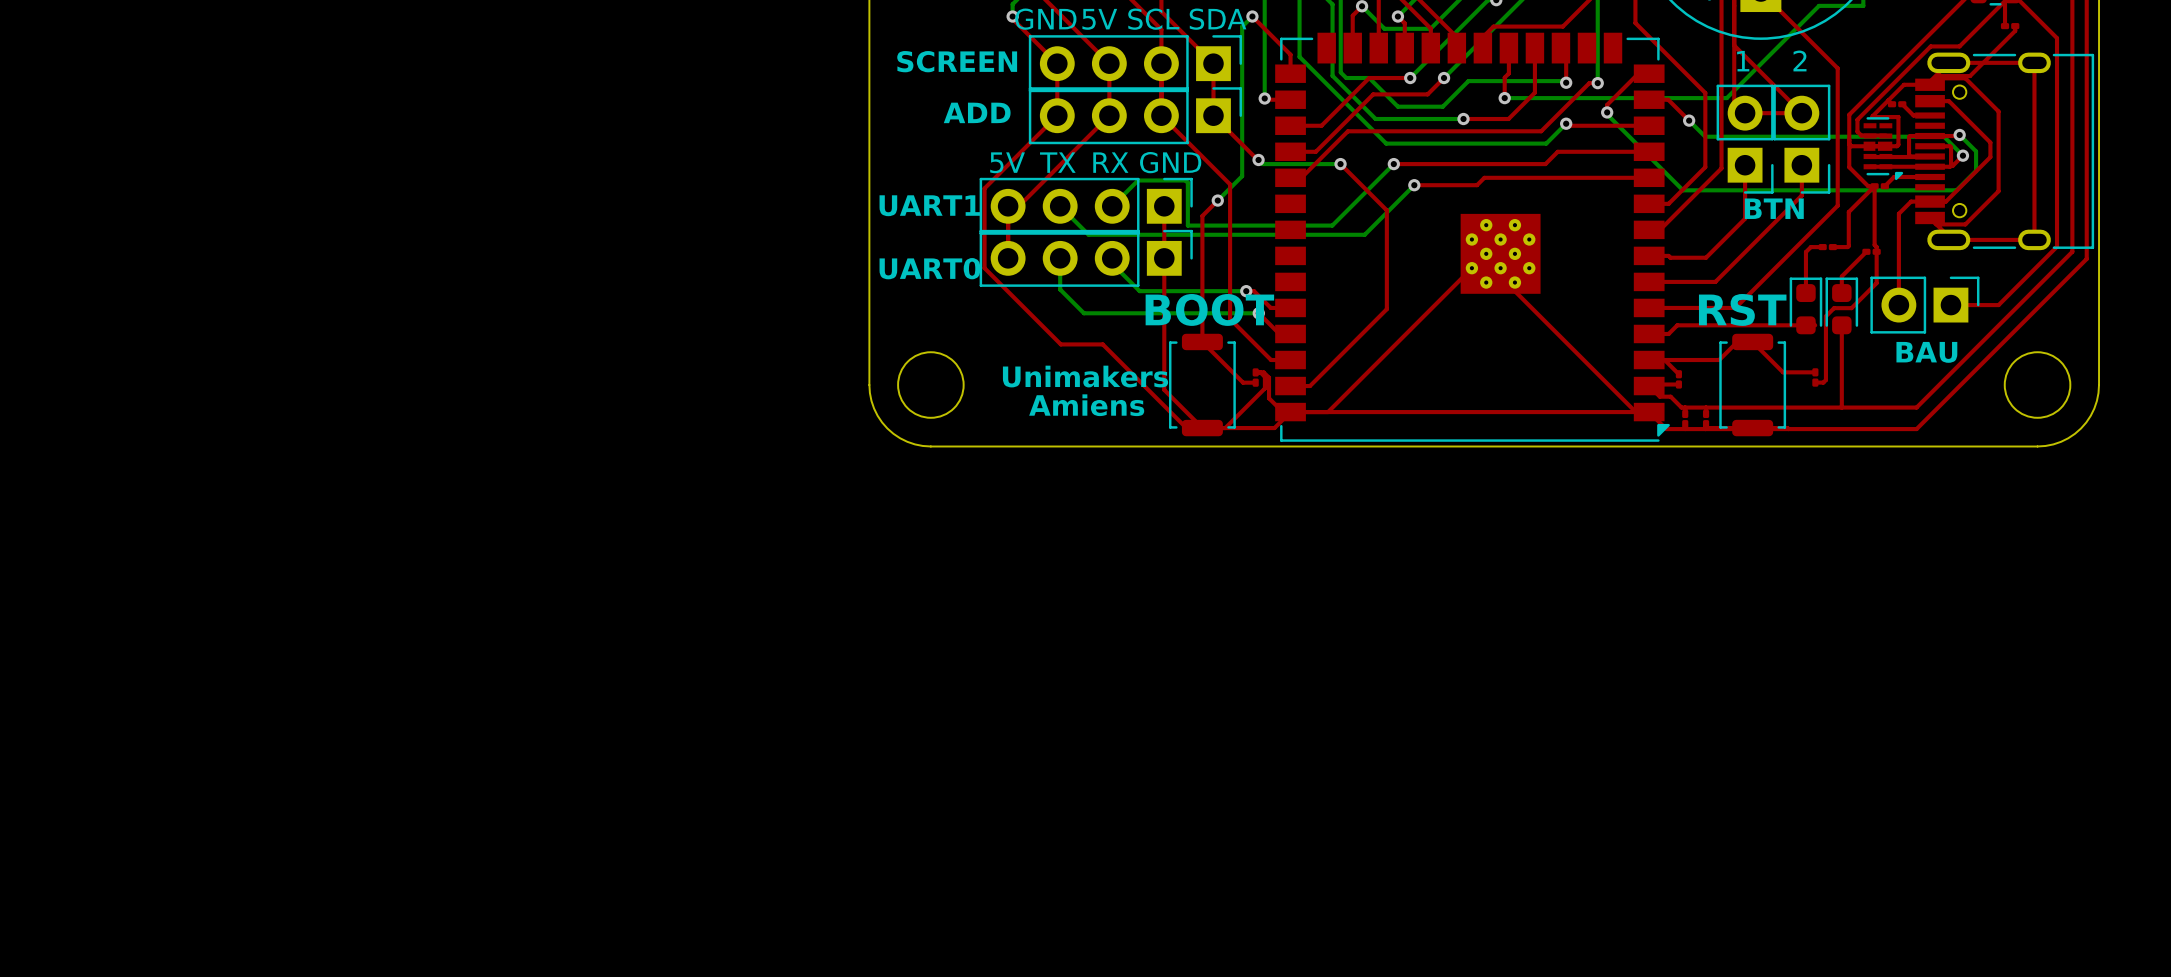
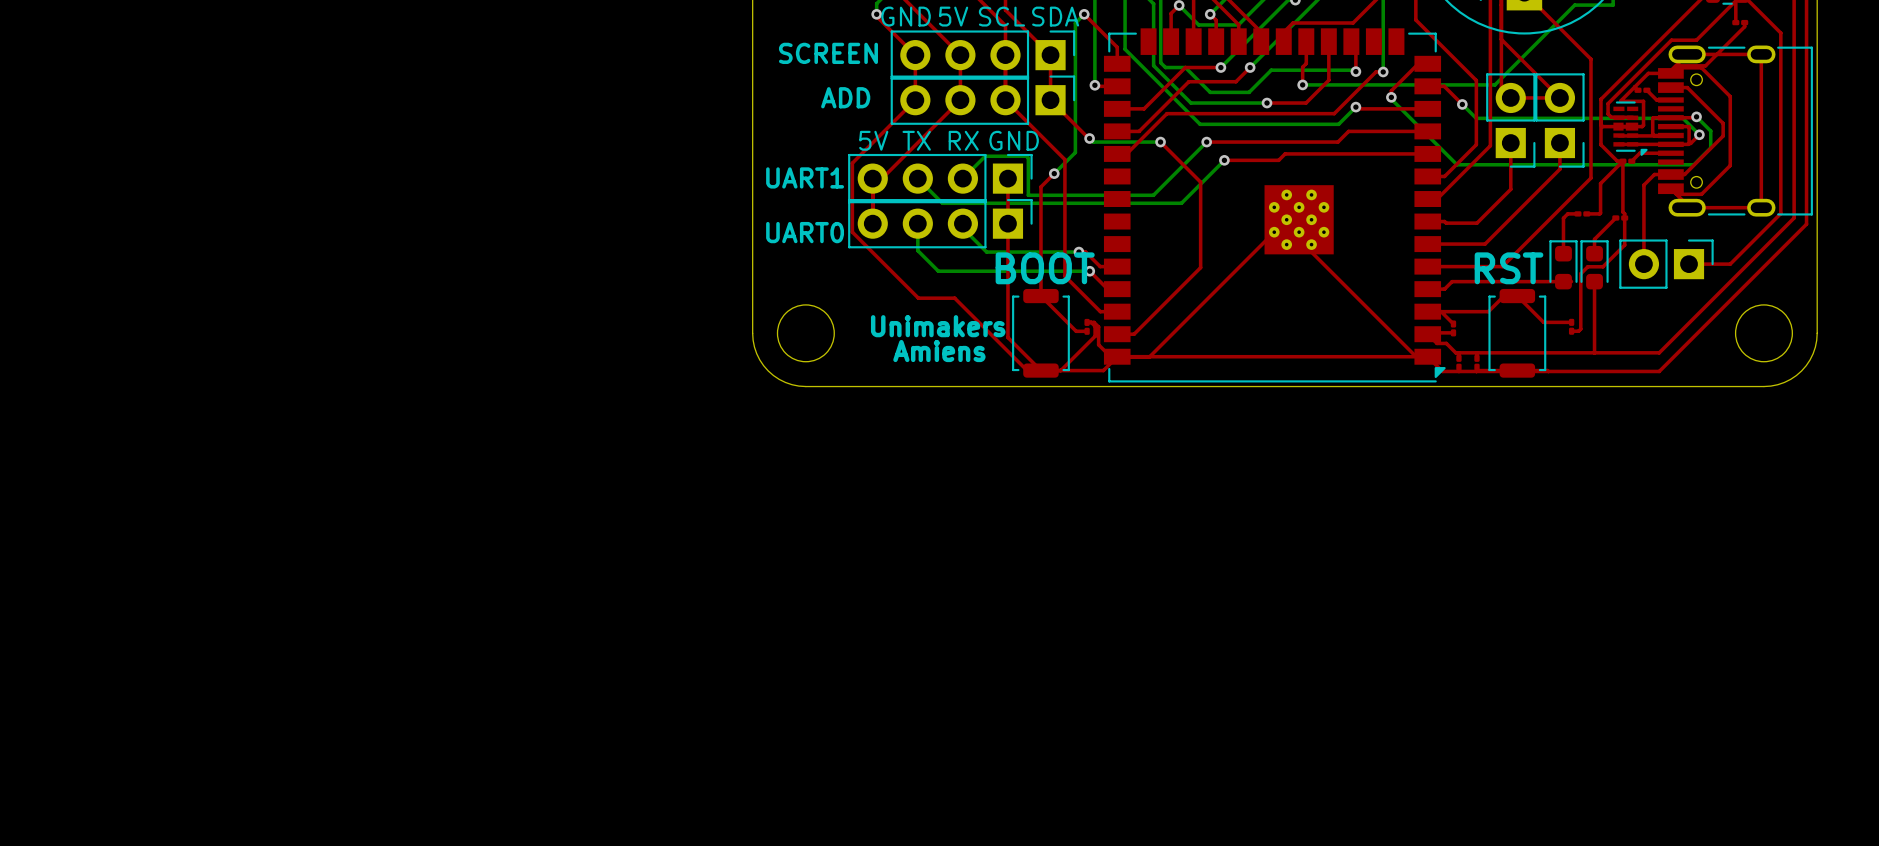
text: 2 (1799, 60) -> none
text: 1 (1743, 61) -> none
text: BTN (1774, 208) -> none
text: BAU (1926, 352) -> none

